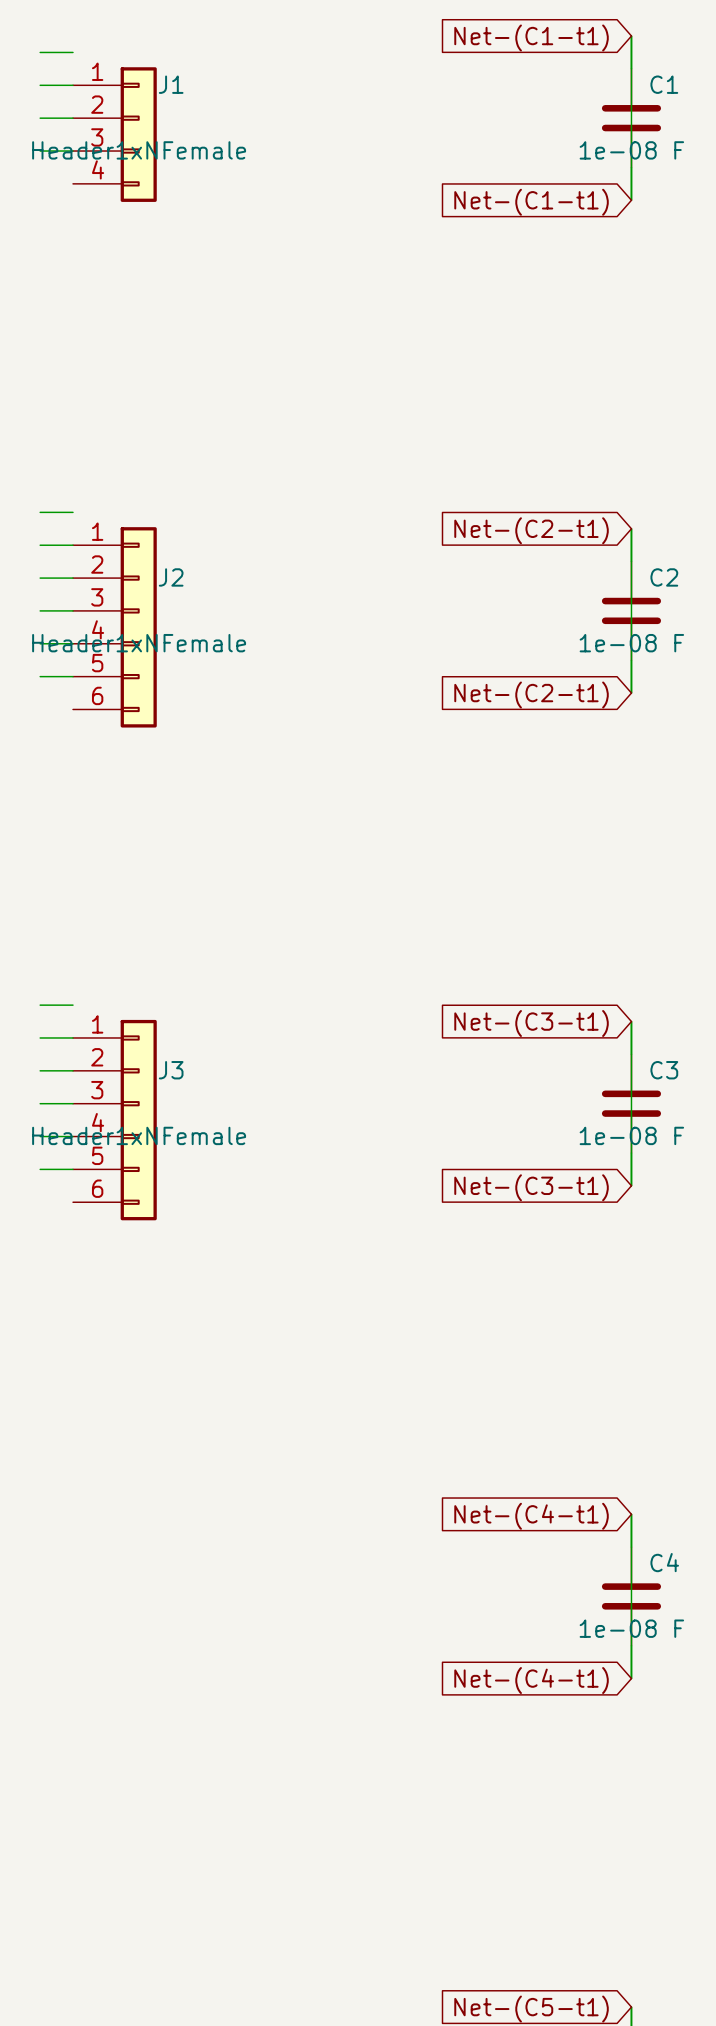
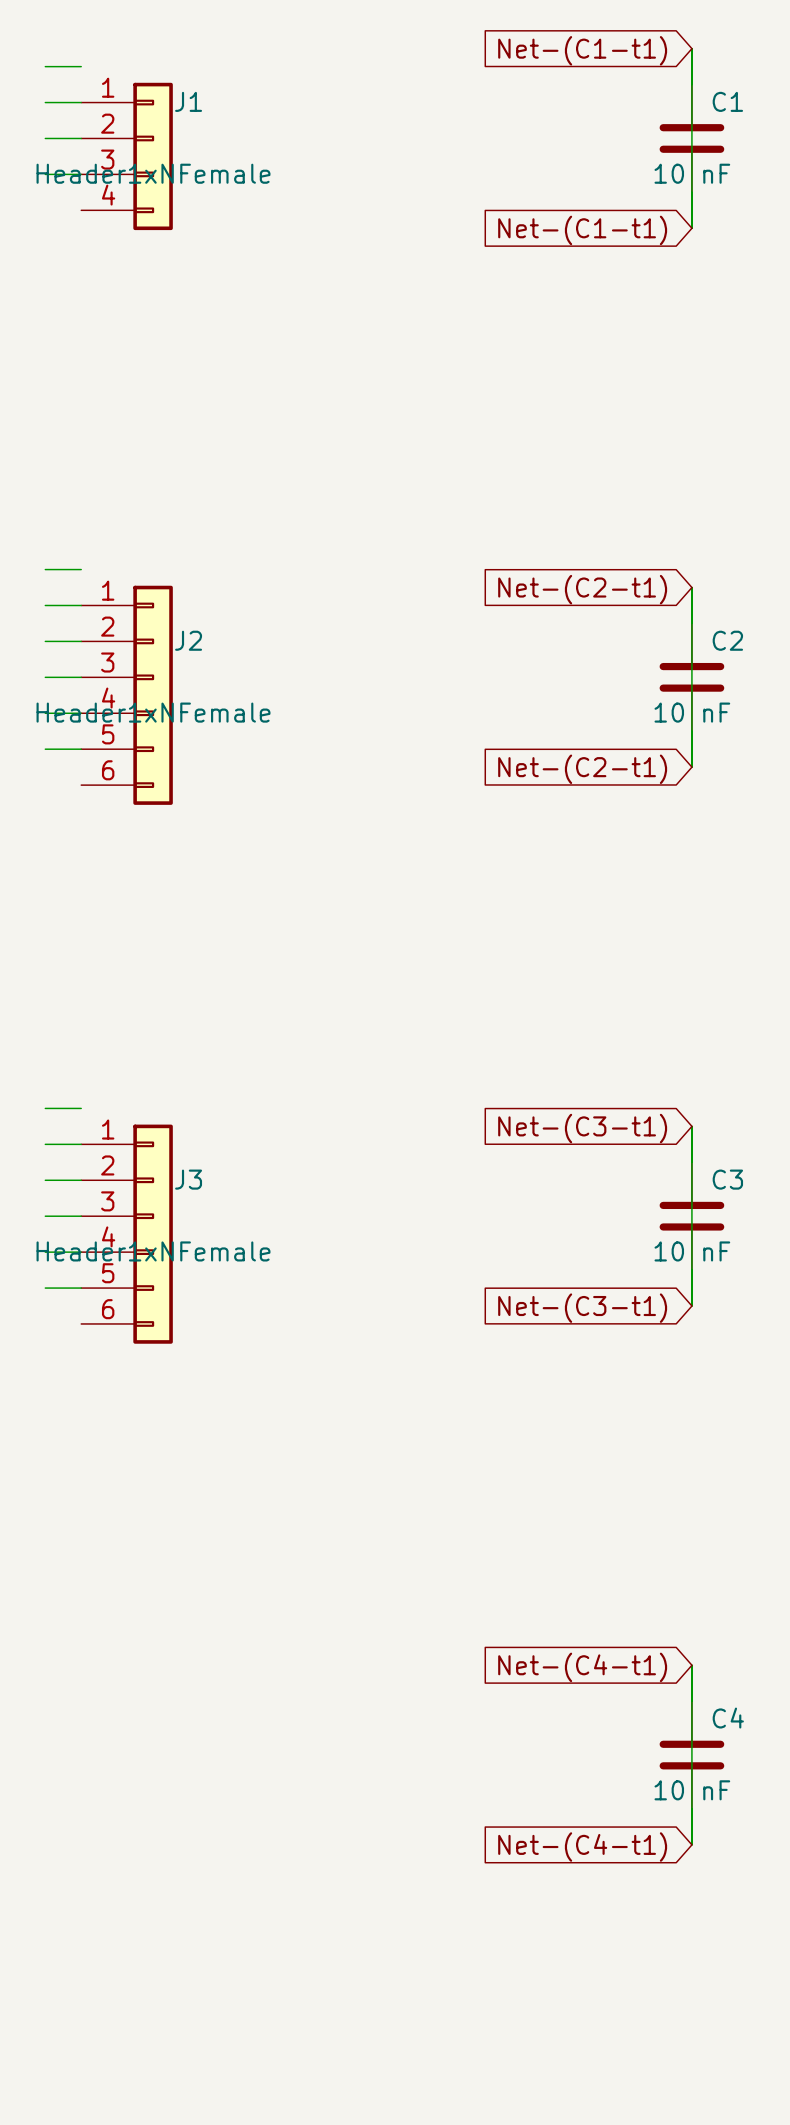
C1 value: 1e-08 F (631, 150) -> 10 nF (692, 173)
C2 value: 1e-08 F (631, 643) -> 10 nF (692, 712)
C3 value: 1e-08 F (631, 1135) -> 10 nF (692, 1251)
C4 value: 1e-08 F (631, 1628) -> 10 nF (692, 1790)

